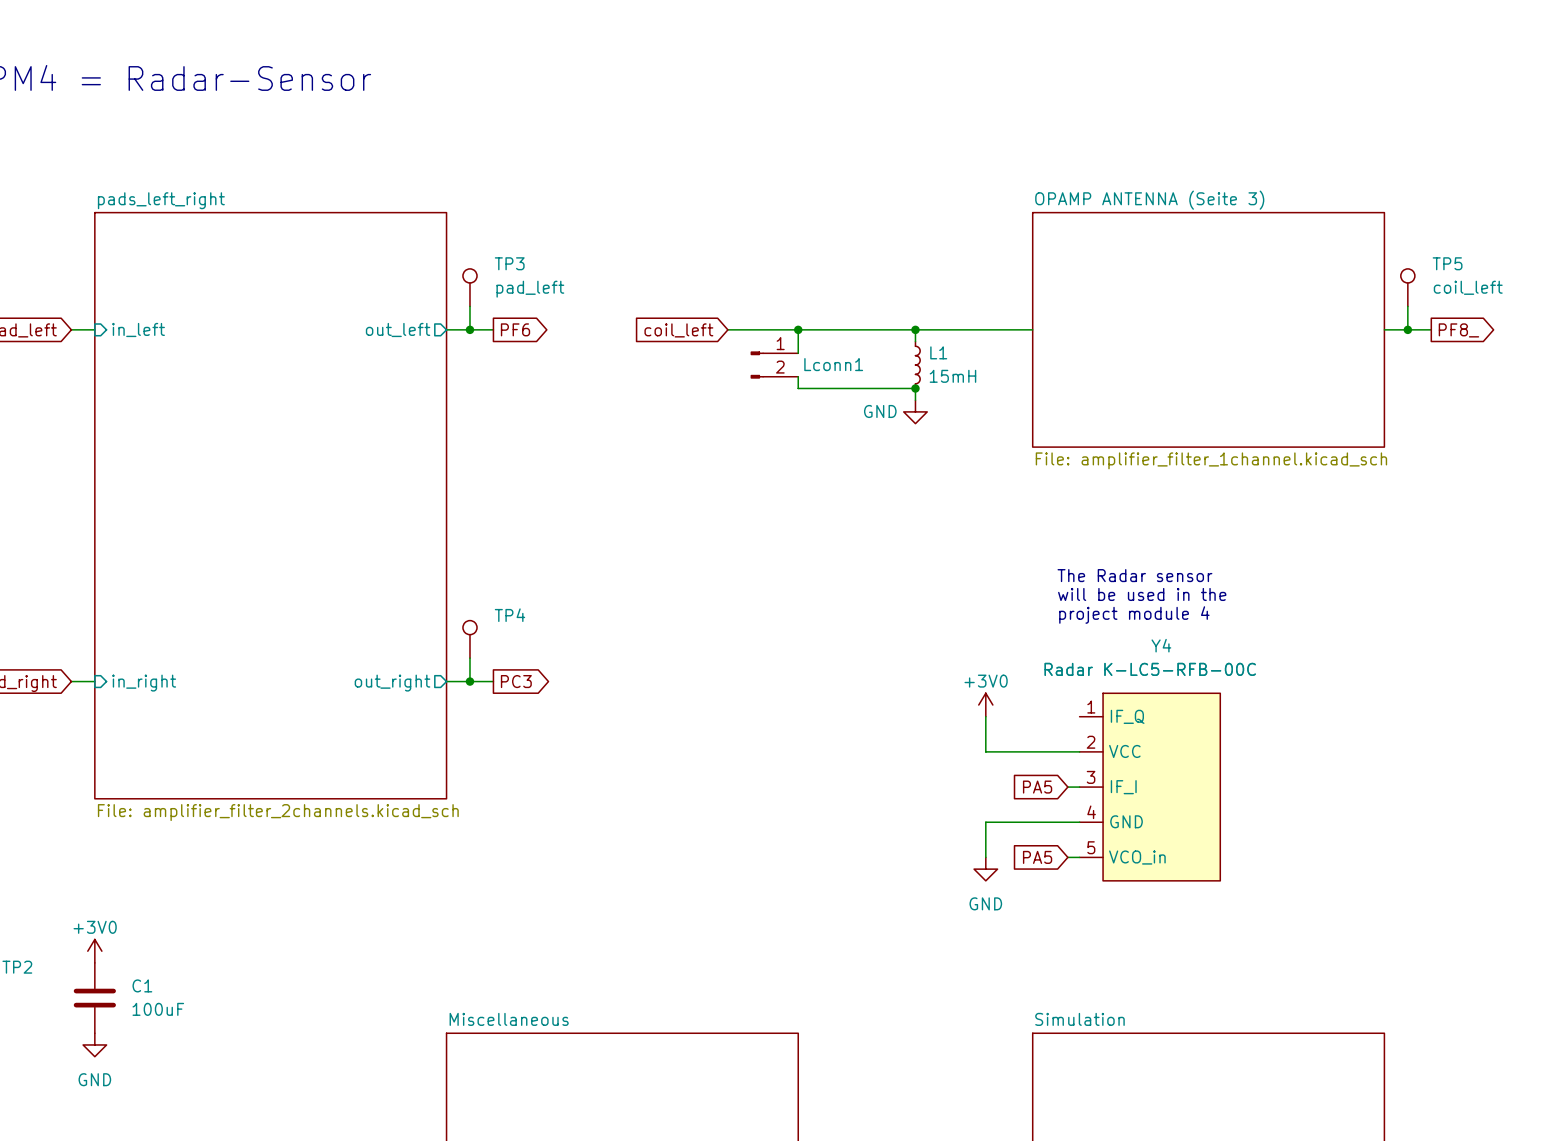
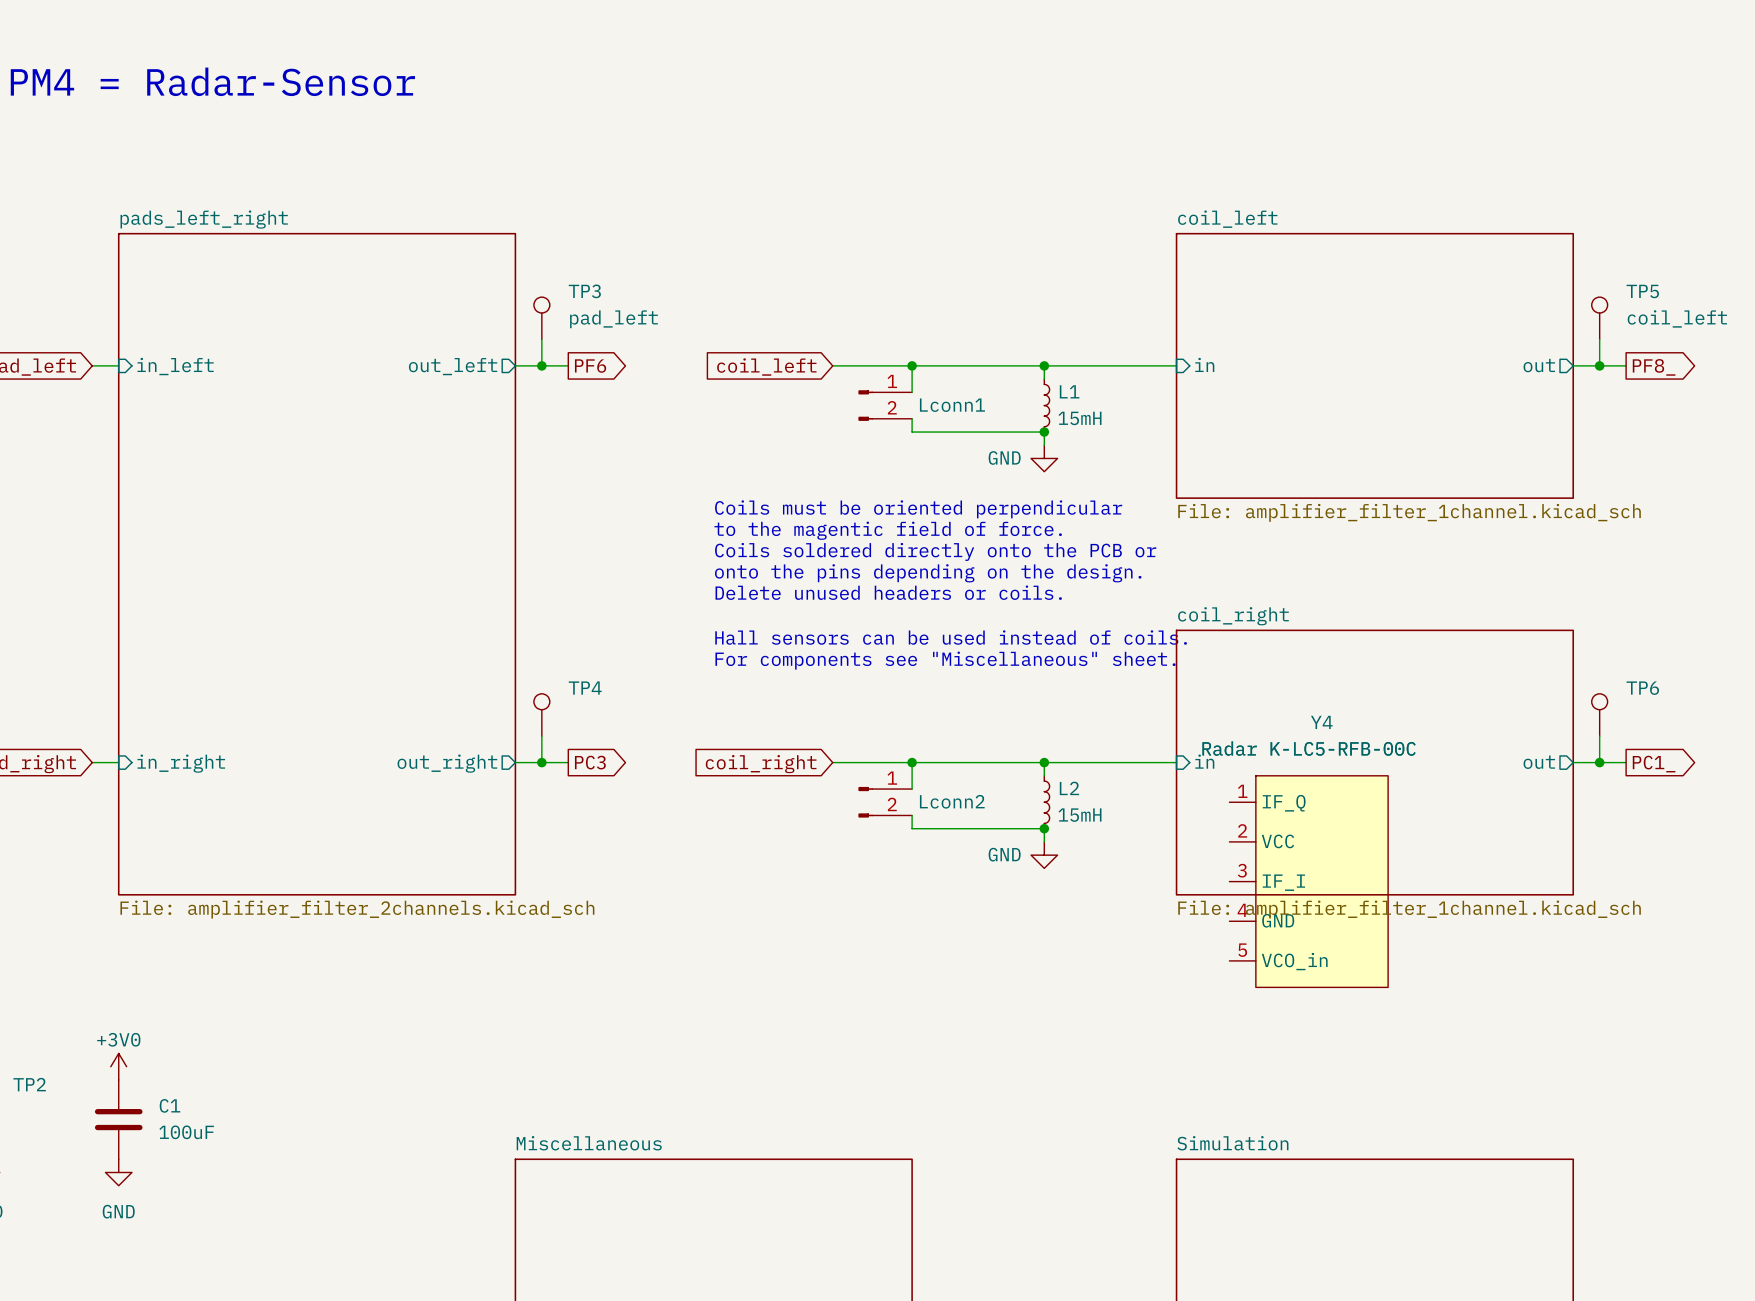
sheet OPAMP ANTENNA (Seite 3) name: OPAMP ANTENNA (Seite 3) (1149, 200) -> coil_left (1227, 219)
sheet pin: none -> in (1204, 364)
sheet pin: none -> out (1539, 365)
text: none -> Coils must be oriented perpendicular (918, 509)
text: none -> to the magentic field of force. (888, 530)
text: none -> Coils soldered directly onto the PCB or (935, 551)
text: none -> onto the pins depending on the design. (928, 573)
text: none -> Delete unused headers or coils. (888, 592)
text: none -> Hall sensors can be used instead of coils. (951, 637)
text: The Radar sensor (1134, 575) -> none
text: none -> For components see "Miscellaneous" sheet. (945, 660)
text: will be used in the (1142, 594) -> none
text: project module 4 (1134, 615) -> none
TP6: none -> (1599, 714)
wire: none -> (1599, 736) (1599, 762)
wire: none -> (832, 762) (1176, 762)
wire: none -> (912, 762) (912, 789)
junction: none -> (912, 762)
wire: none -> (1044, 762) (1044, 775)
junction: none -> (1044, 762)
sheet pin: none -> in (1204, 761)
sheet coil_right: none -> File: amplifier_filter_1channel.kicad_sch (1374, 762)
sheet pin: none -> out (1539, 762)
wire: none -> (1573, 762) (1626, 762)
junction: none -> (1599, 762)
global label: none -> PC1_ (1654, 764)
global label: none -> coil_right (761, 764)
power symbol: +3V0 (985, 705) -> none
Lconn2: none -> (885, 802)
L2: none -> 15mH (1046, 802)
wire: (985, 716) (985, 751) (1079, 751) -> none
wire: none -> (912, 815) (912, 828) (1044, 828) (1044, 841)
junction: none -> (1044, 828)
global label: PA5 (1037, 787) -> none
wire: (1067, 787) (1079, 787) -> none
wire: (1079, 822) (985, 822) (985, 857) -> none
global label: PA5 (1037, 857) -> none
wire: (1067, 857) (1079, 857) -> none
power symbol position: GND (985, 869) -> GND (1044, 855)
power symbol text position: GND (985, 903) -> GND (1004, 854)

